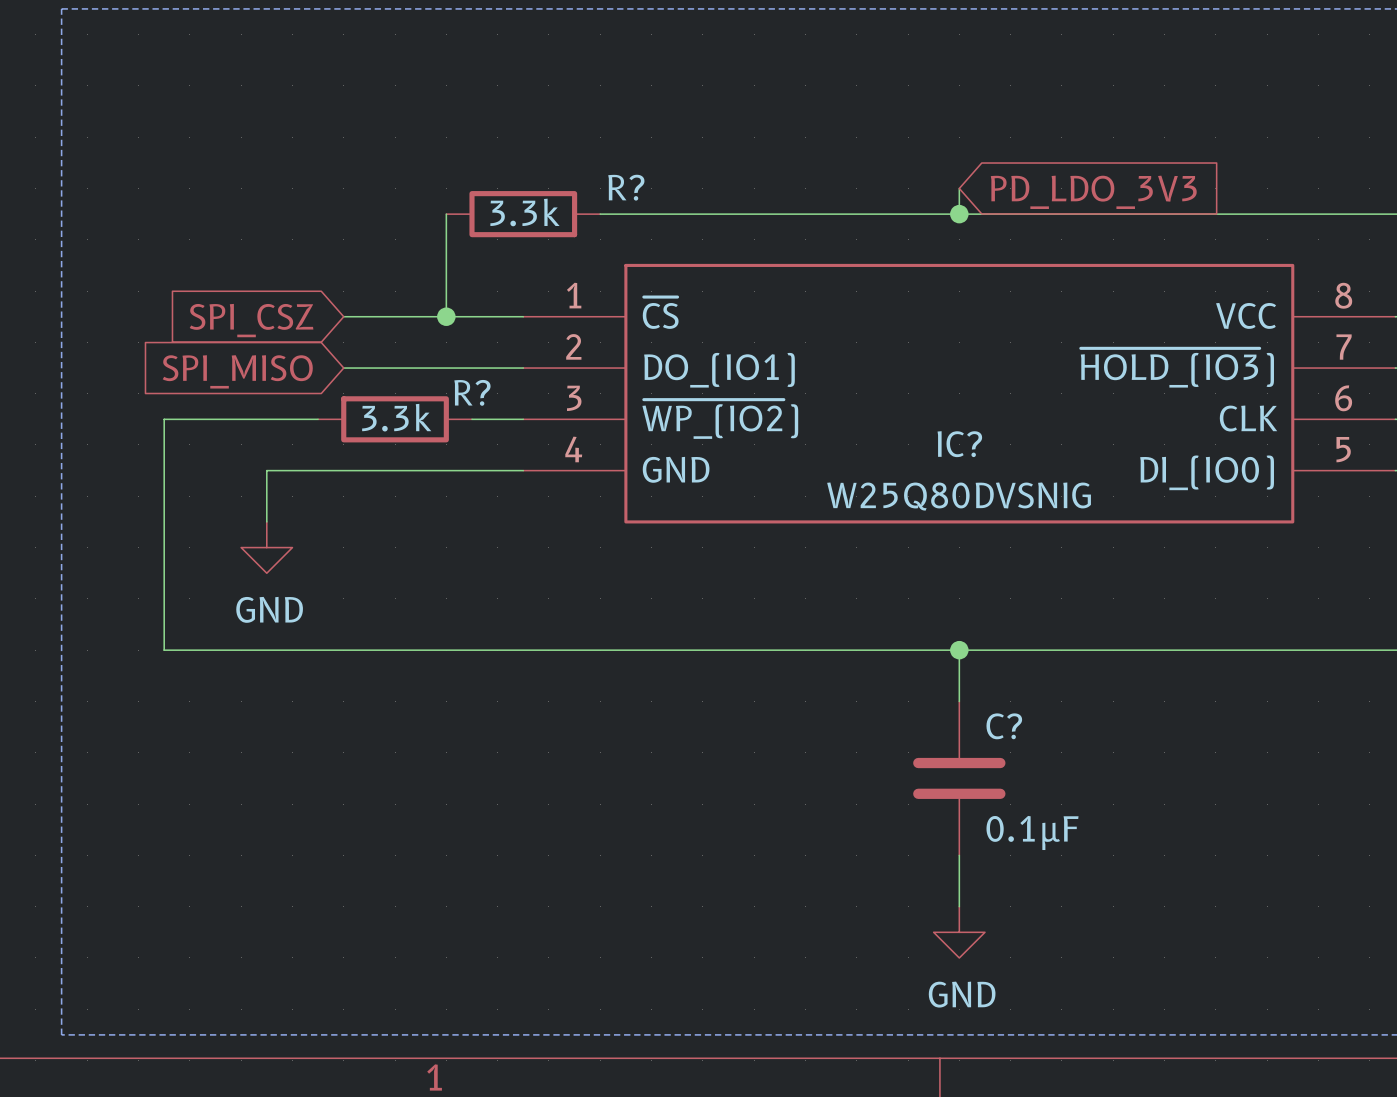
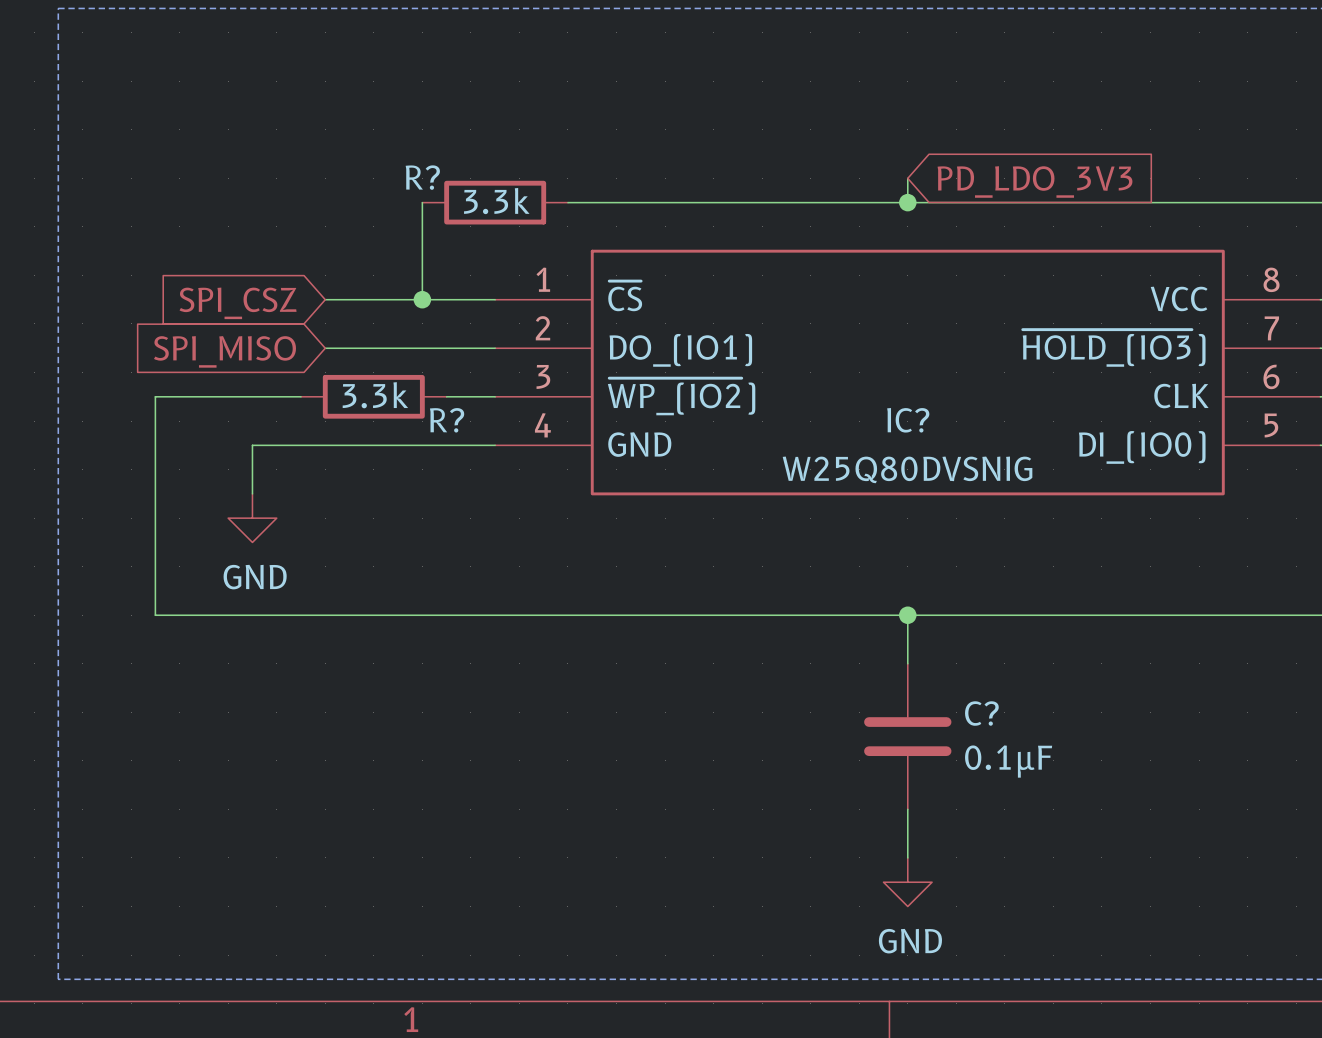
R? name position: R? (626, 187) -> R? (422, 177)
R? name position: R? (472, 392) -> R? (447, 420)
C? name position: C? (1004, 726) -> C? (981, 713)
C? value position: 0.1µF (1032, 832) -> 0.1µF (1008, 761)

